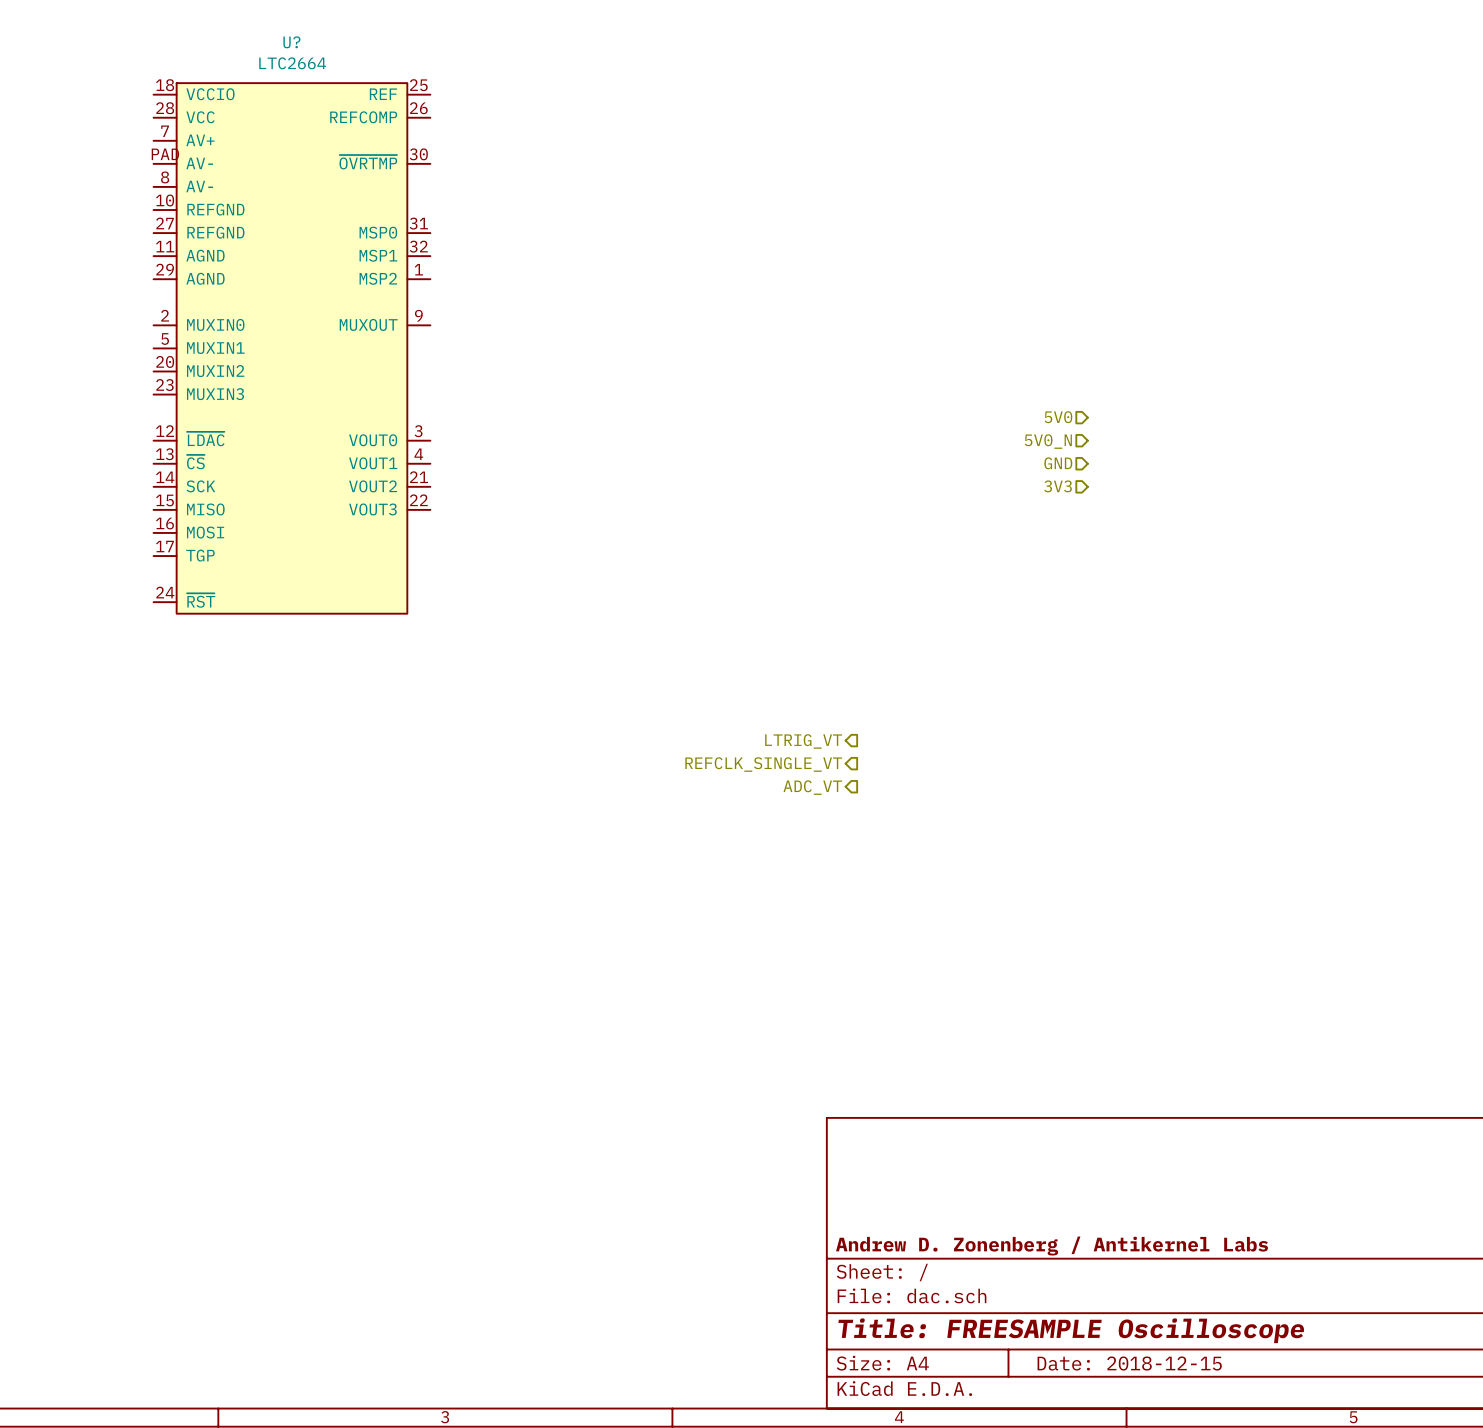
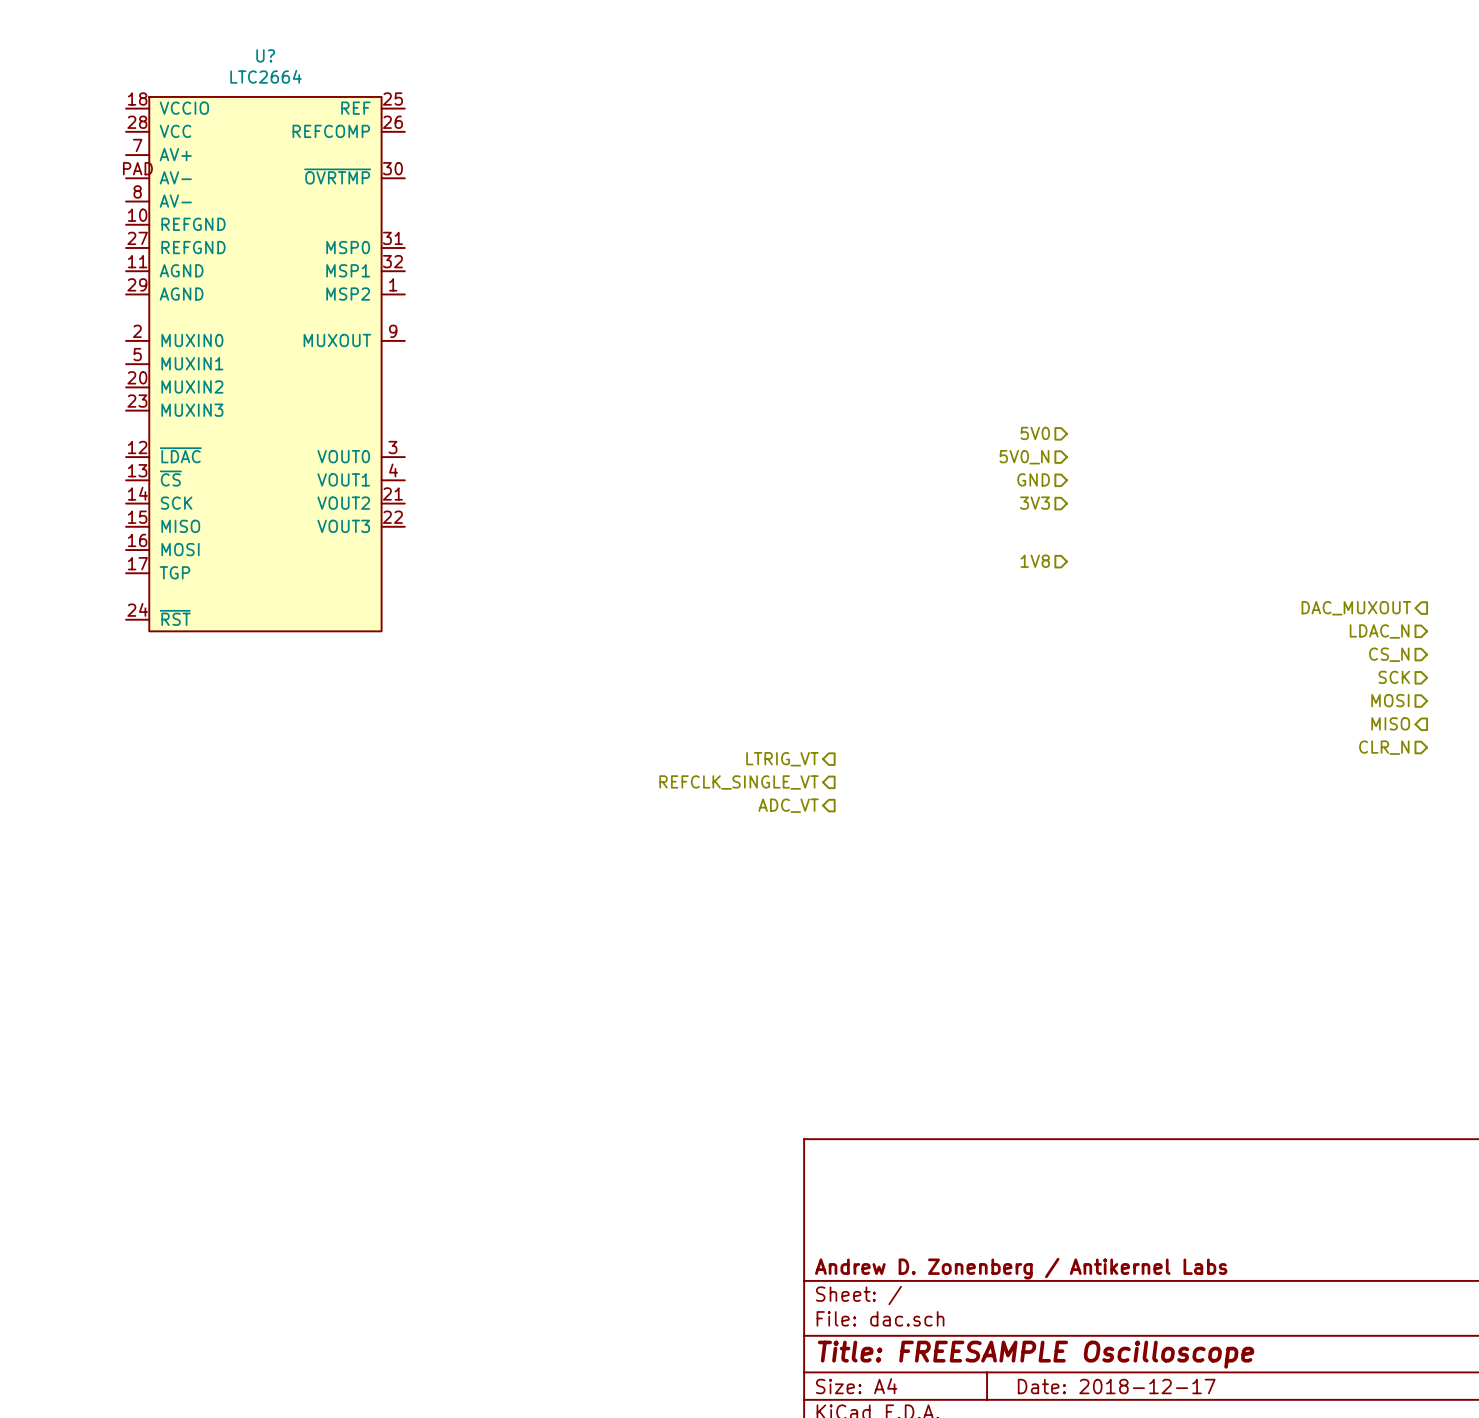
hierarchical label: none -> 1V8 (1035, 561)
hierarchical label: none -> DAC_MUXOUT (1356, 608)
hierarchical label: none -> LDAC_N (1379, 631)
hierarchical label: none -> CS_N (1389, 654)
hierarchical label: none -> SCK (1394, 677)
hierarchical label: none -> MOSI (1390, 700)
hierarchical label: none -> MISO (1390, 723)
hierarchical label: none -> CLR_N (1384, 747)
title block: Date: 2018-12-15 (1129, 1363) -> Date: 2018-12-17 (1116, 1386)

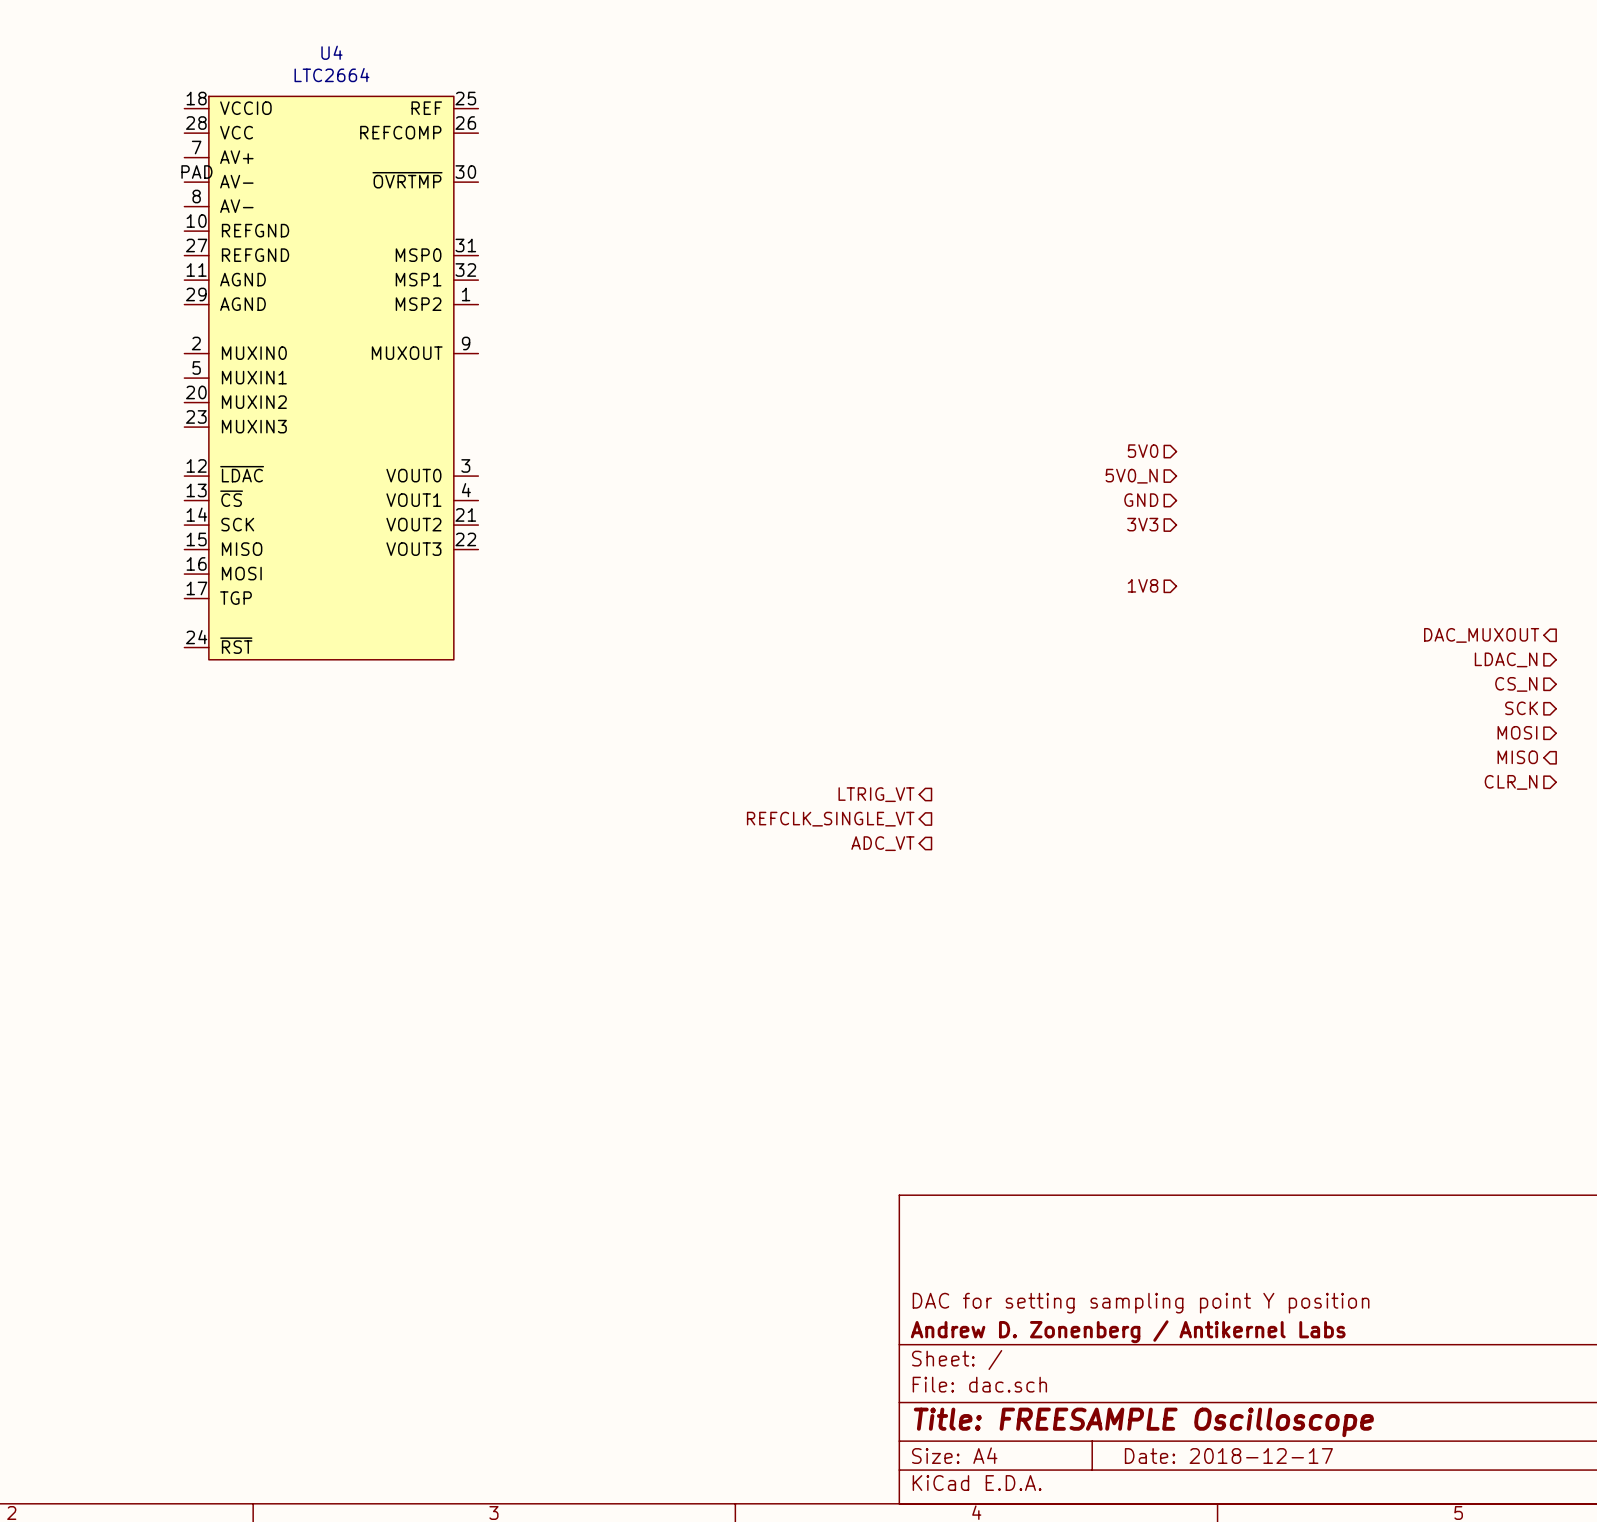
U? name: U? (265, 55) -> U4 (331, 52)
title block: none -> DAC for setting sampling point Y position (1141, 1303)

